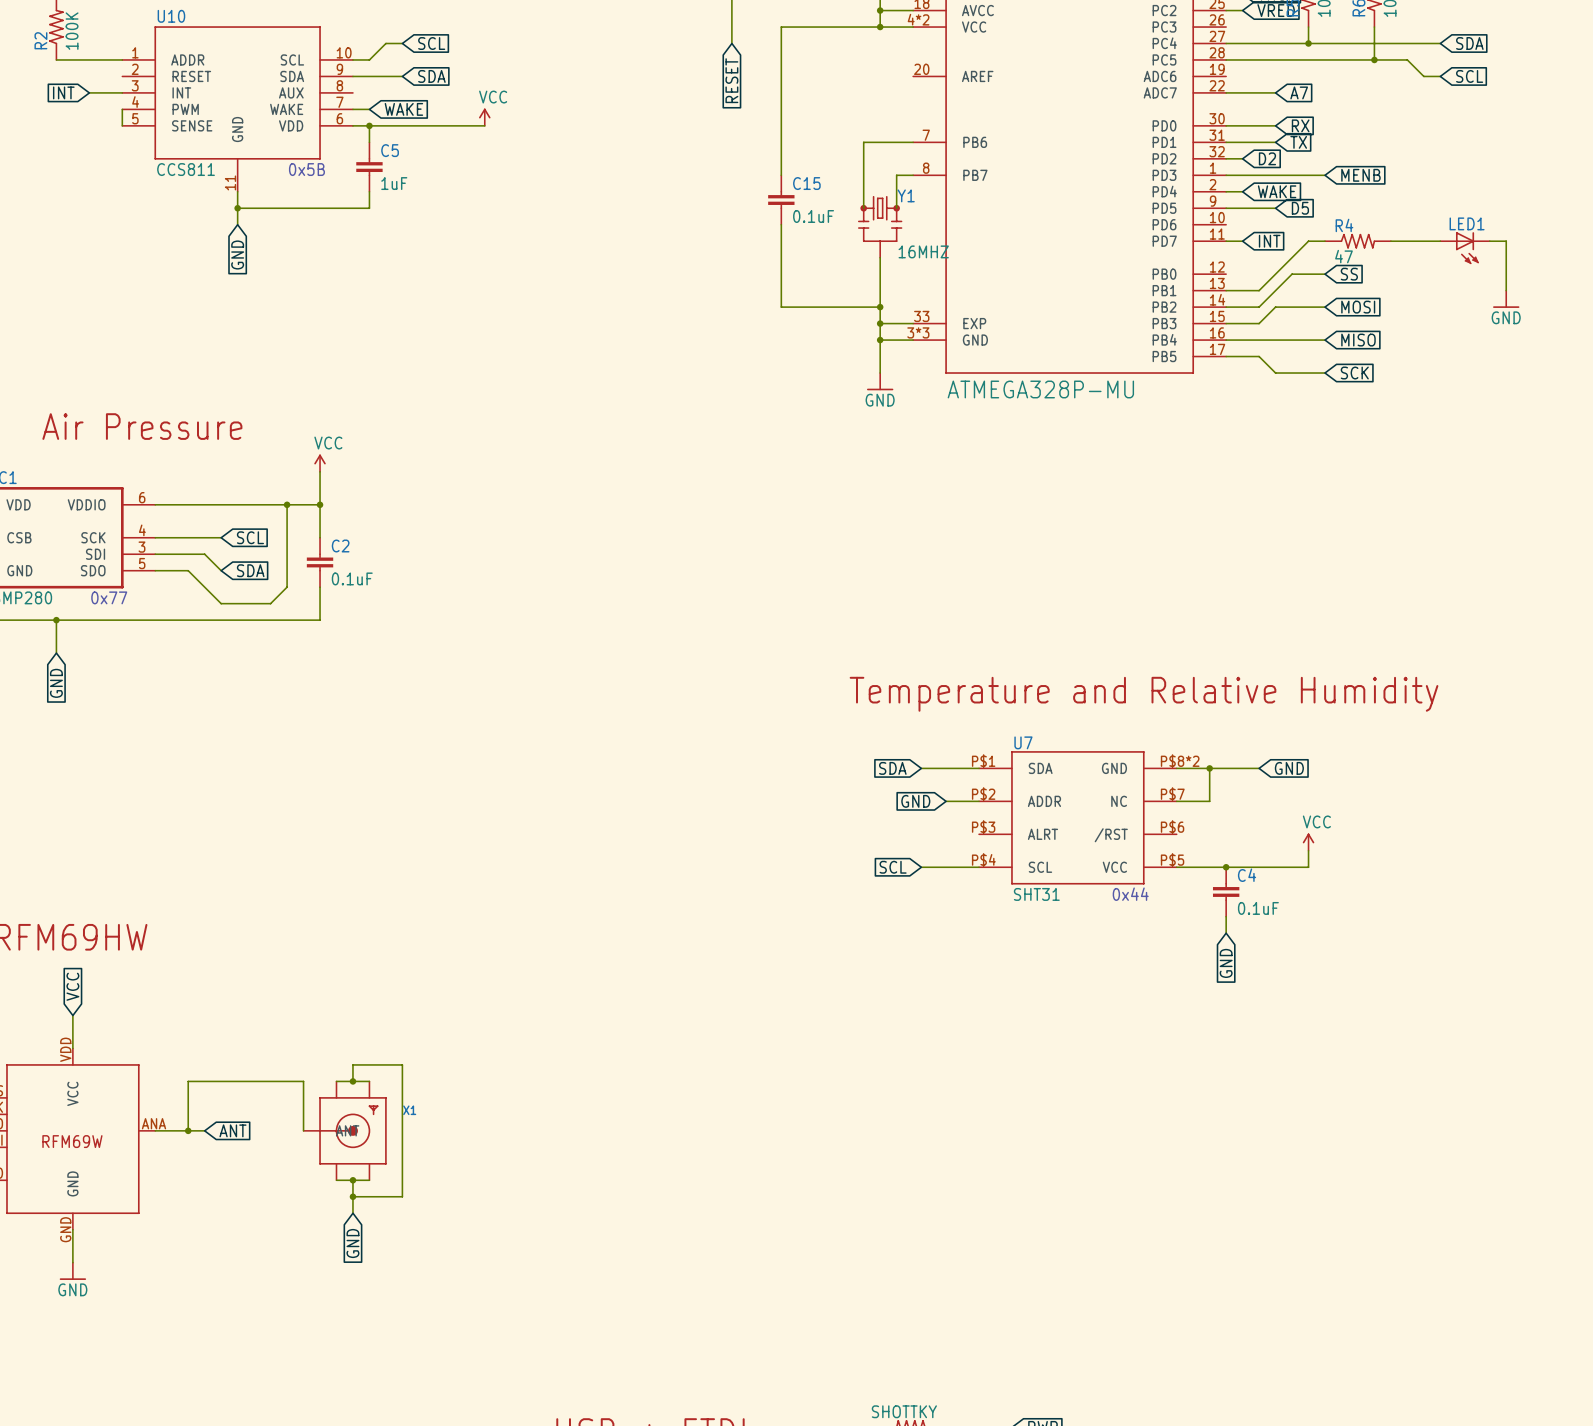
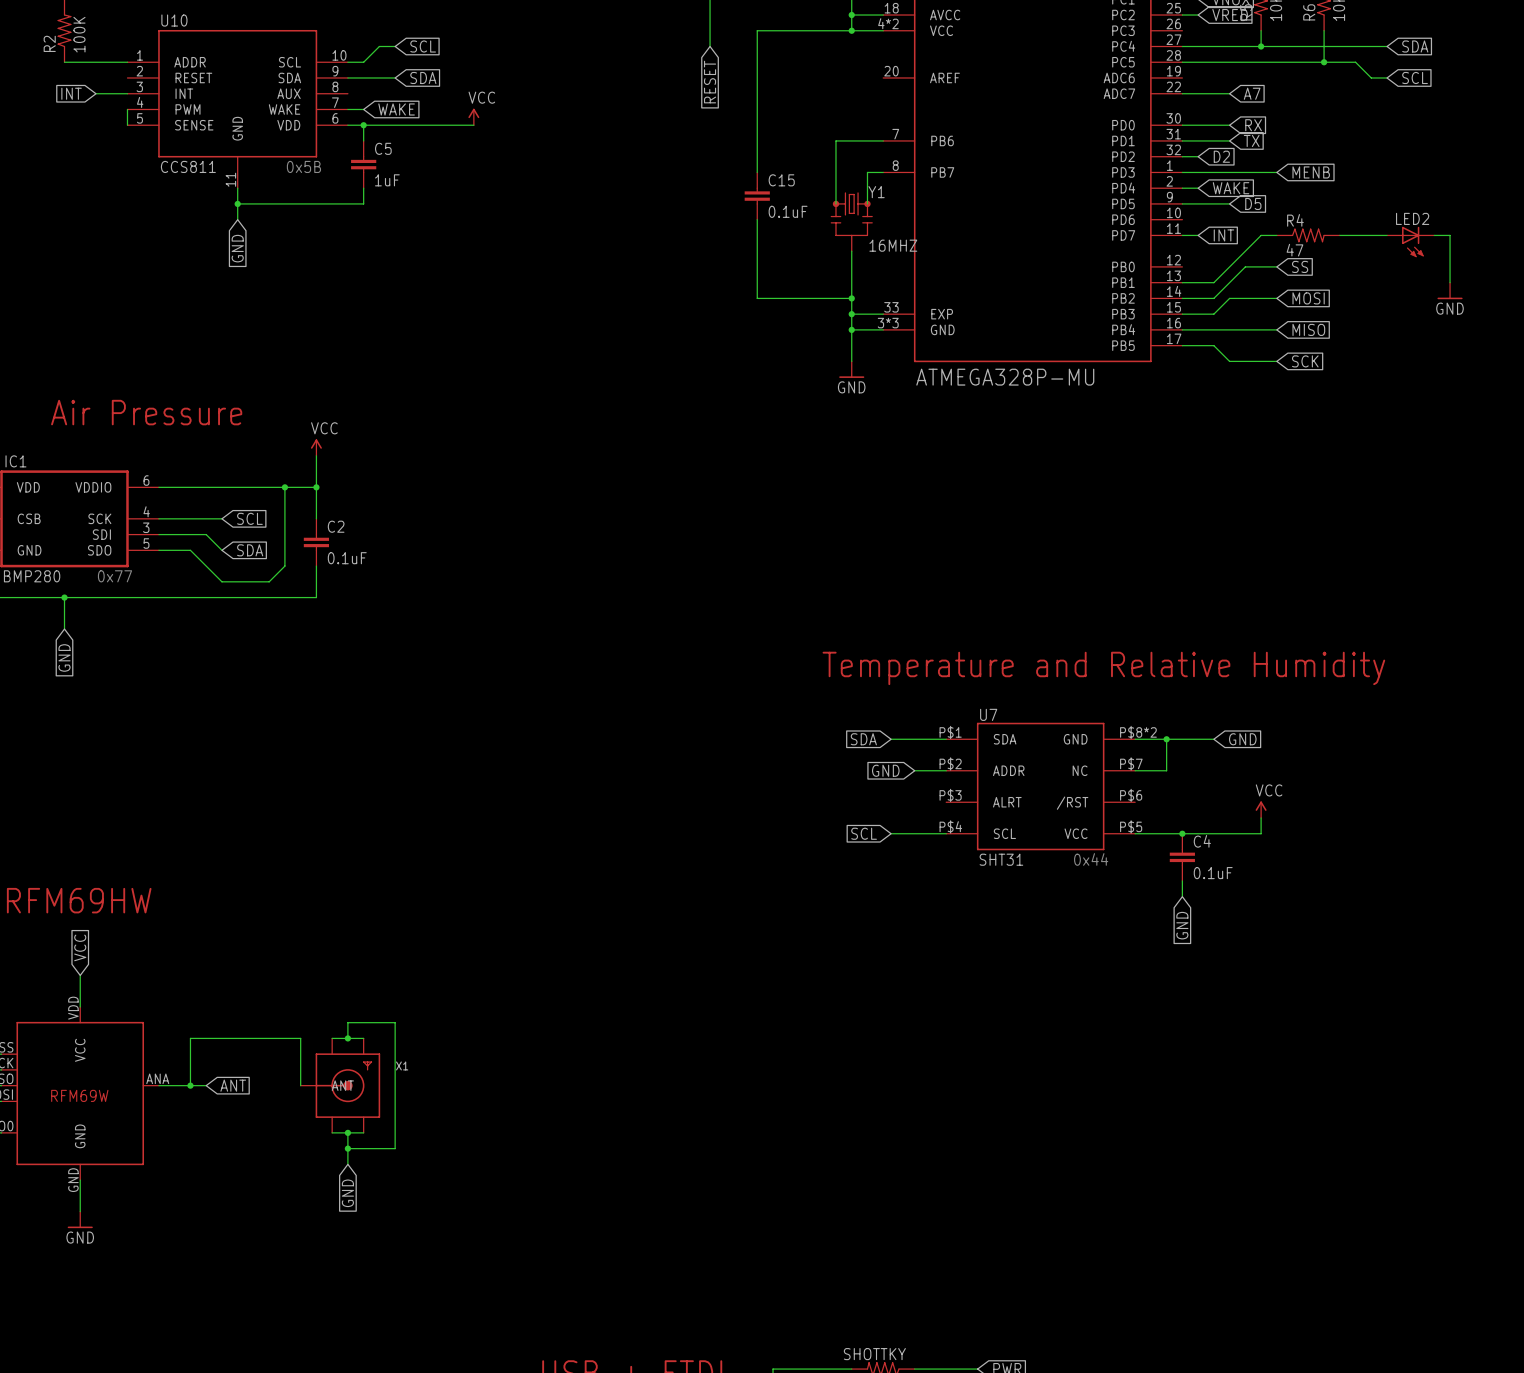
LED1 name: LED1 (1467, 223) -> LED2 (1412, 218)

